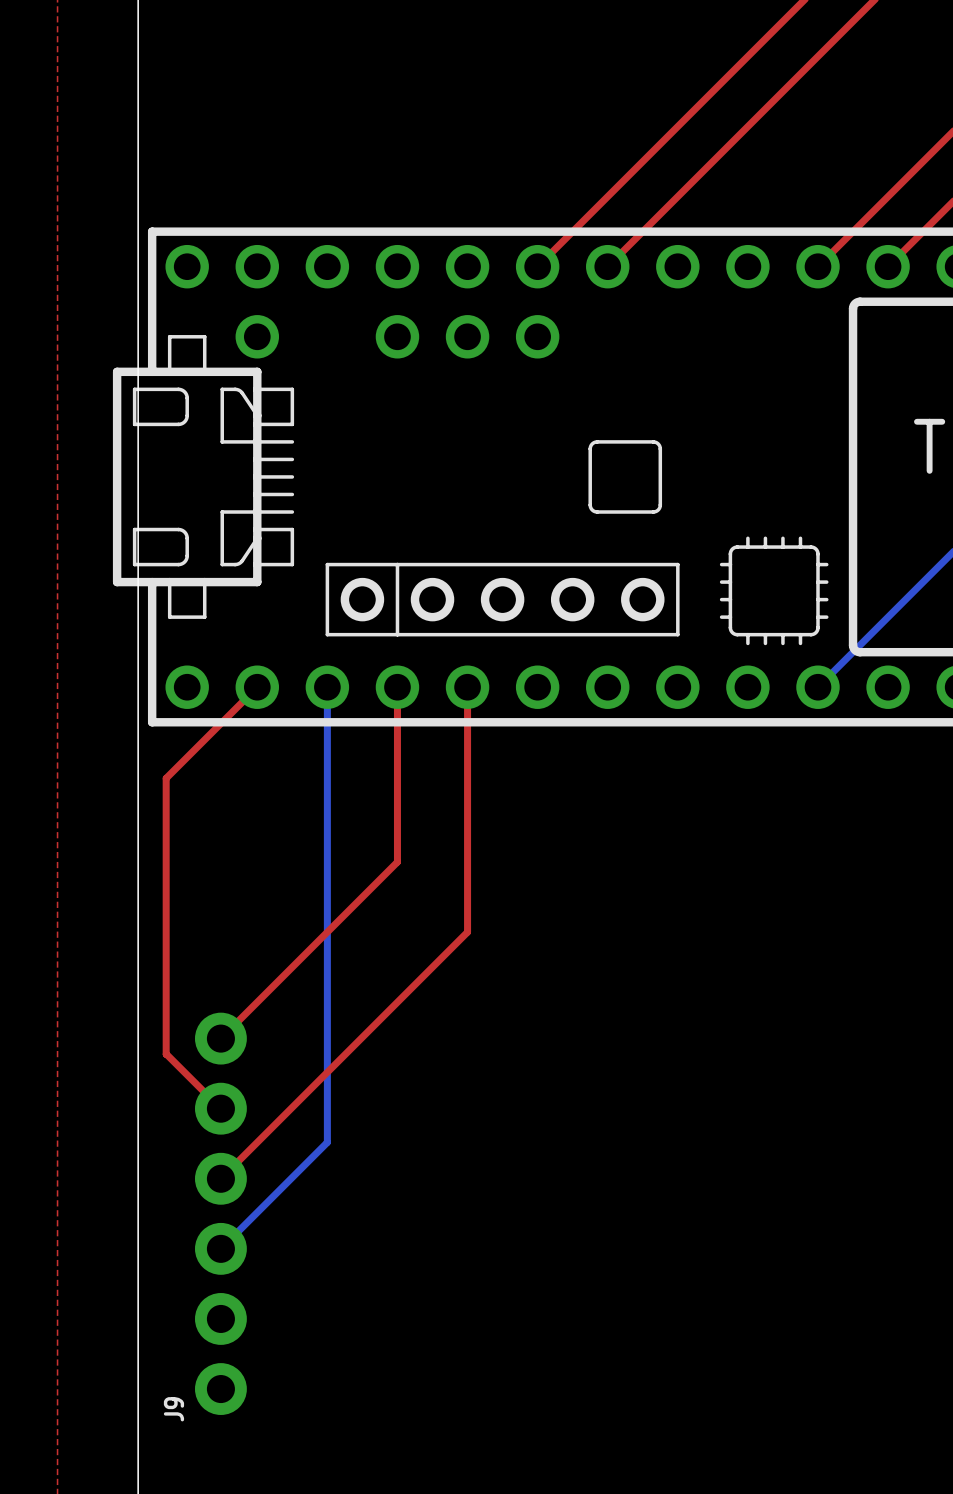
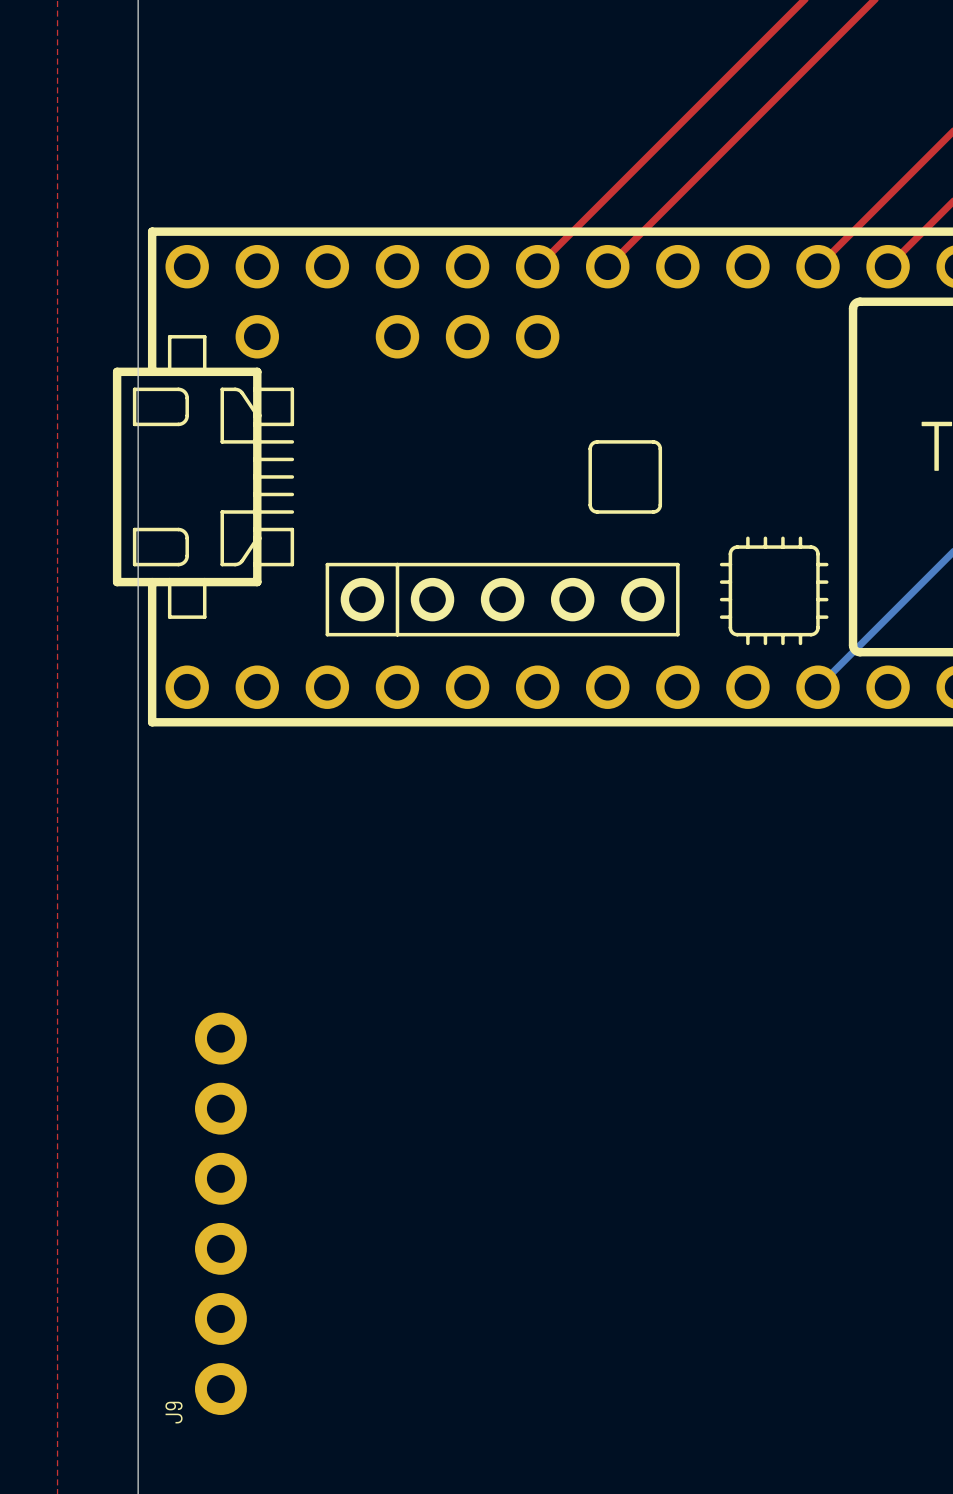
top track: (257, 687) (166, 778) (166, 1054) -> none
bottom track: (327, 687) (327, 1142) (220, 1248) -> none
top track: (397, 687) (397, 862) (220, 1038) -> none
top track: (467, 687) (467, 932) (220, 1178) -> none
top track: (166, 1054) (220, 1108) -> none

